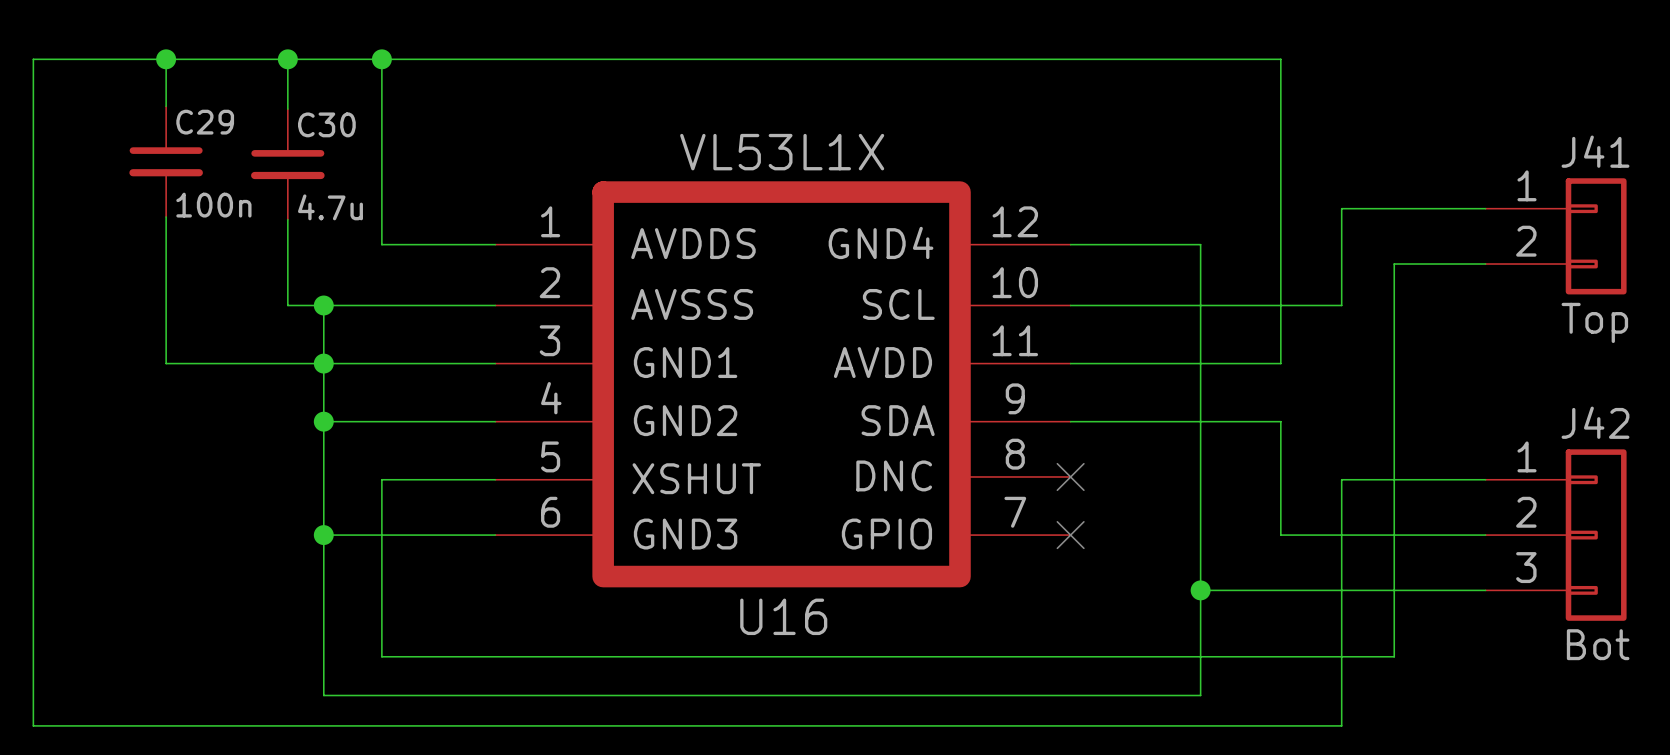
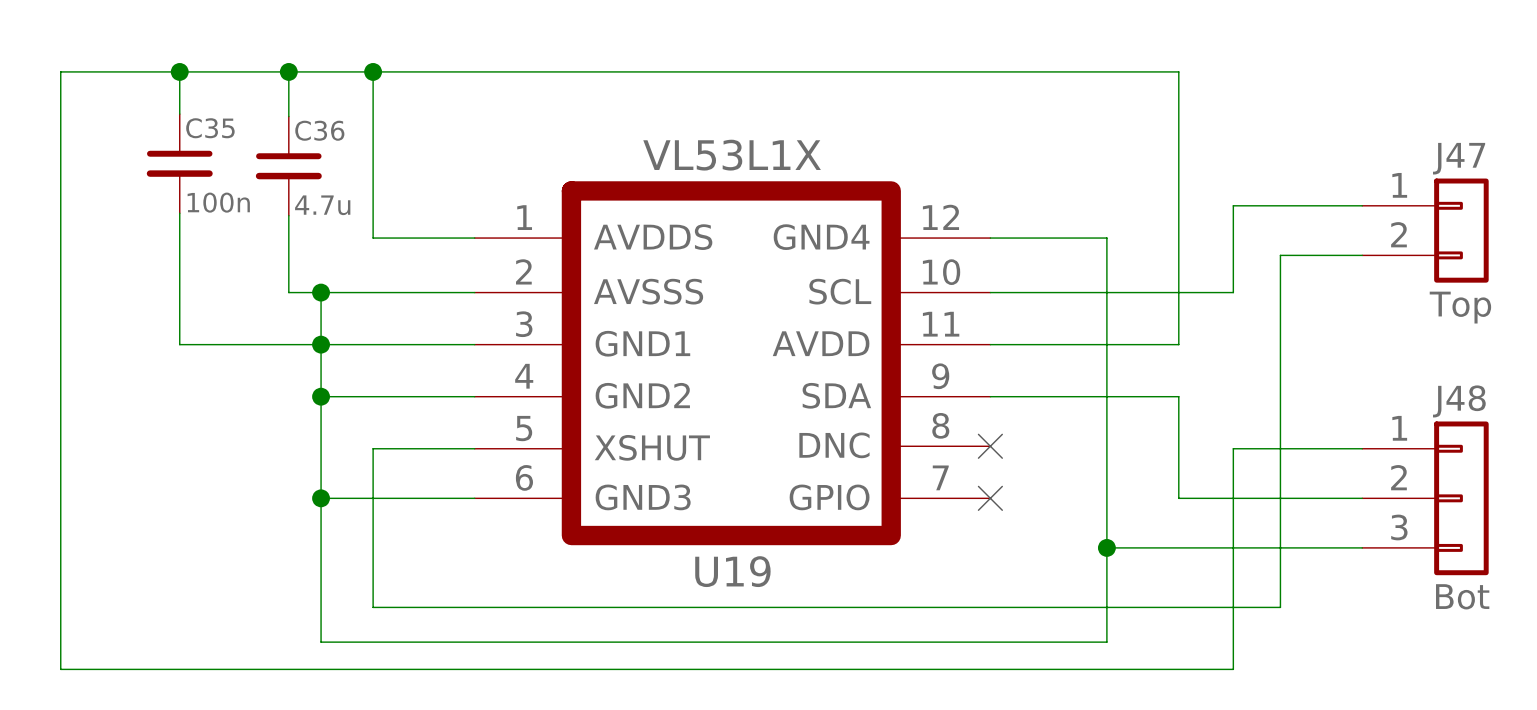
C29 name: C29 (205, 122) -> C35 (210, 128)
C30 name: C30 (326, 124) -> C36 (319, 130)
J41 name: J41 (1595, 151) -> J47 (1459, 158)
J42 name: J42 (1595, 422) -> J48 (1459, 401)
U16 name: U16 (783, 616) -> U19 (732, 571)

